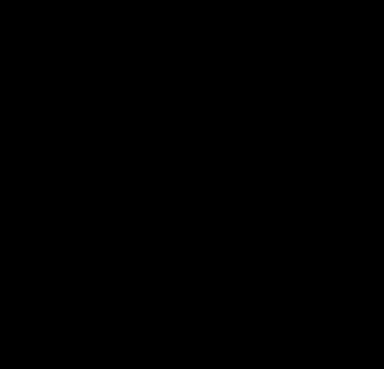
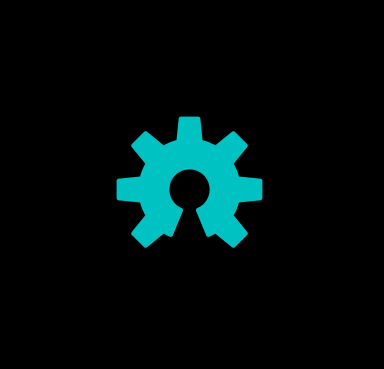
drawing: none -> [116, 116, 263, 248]

